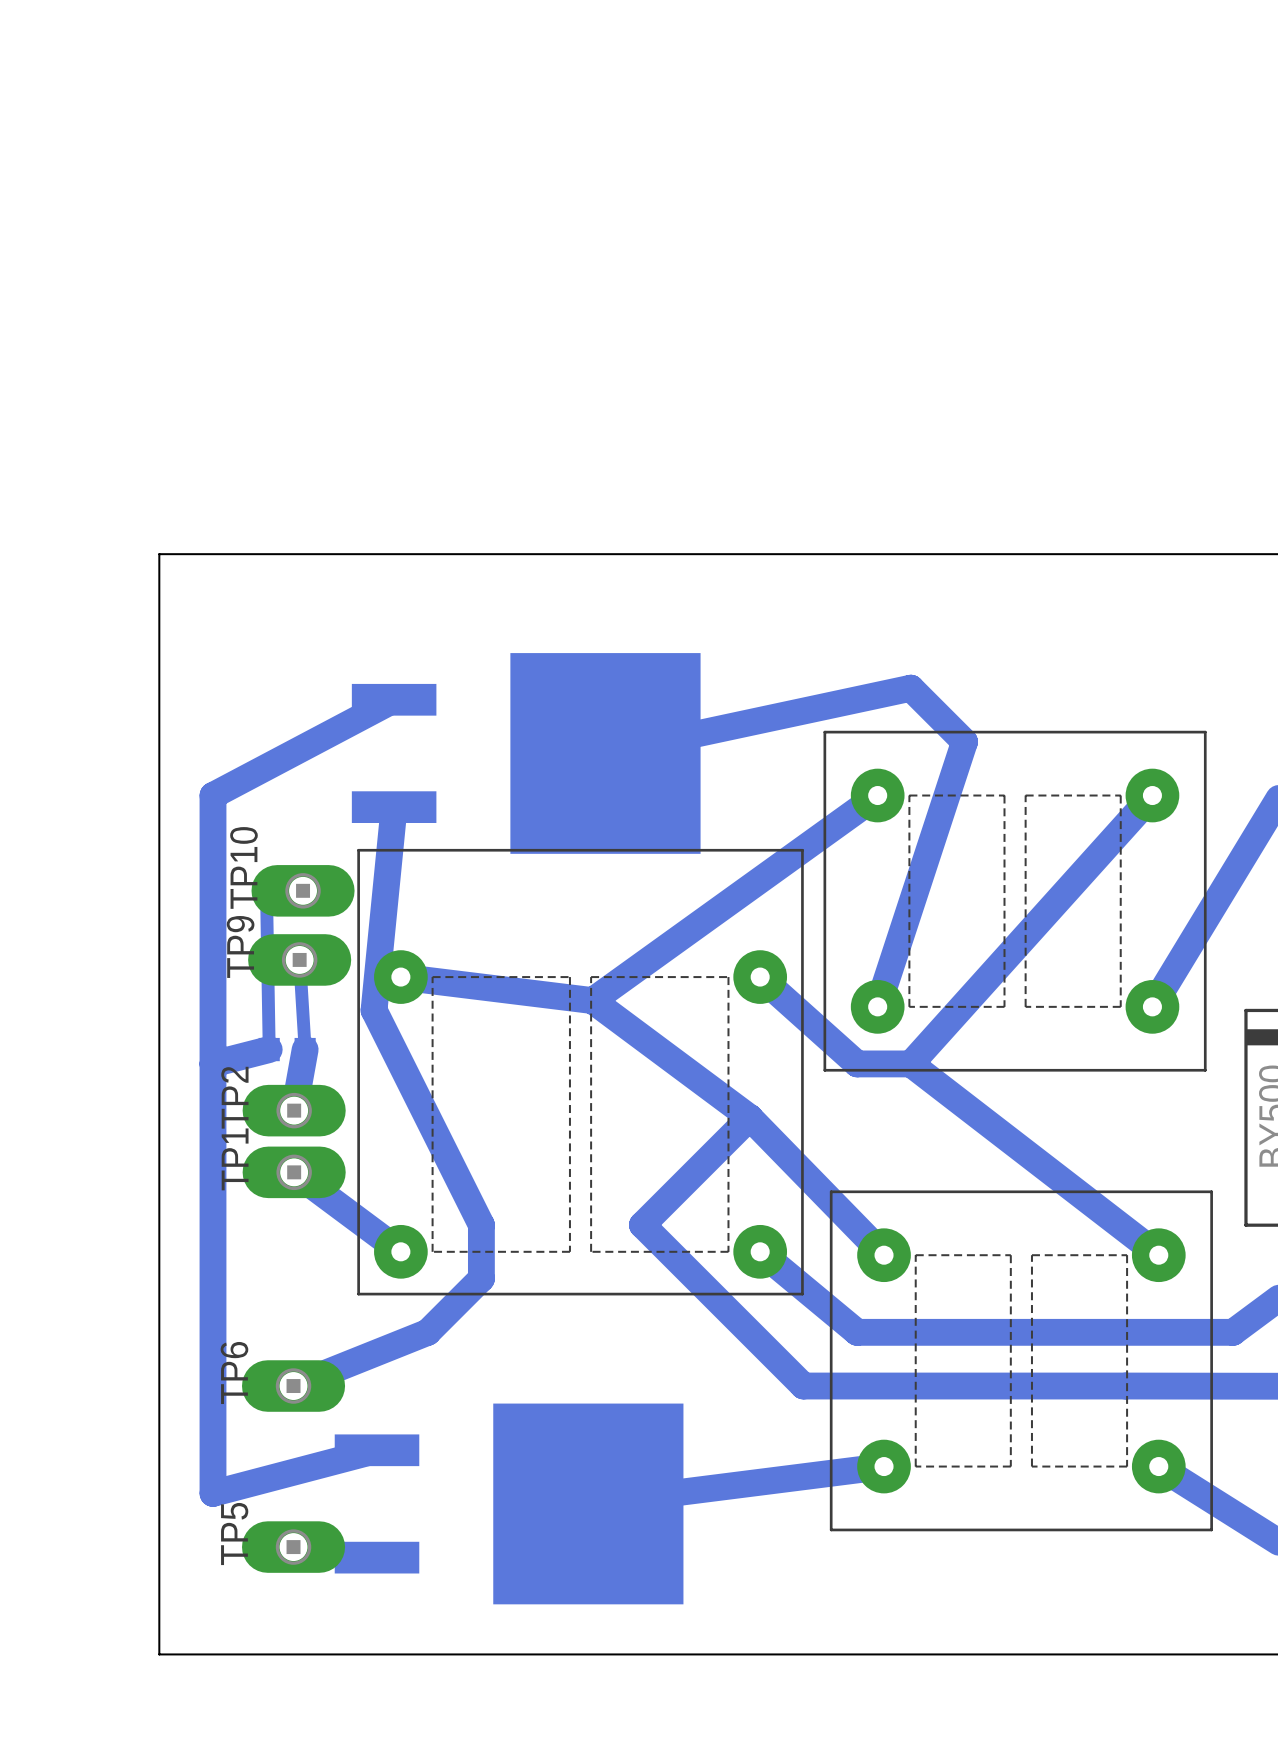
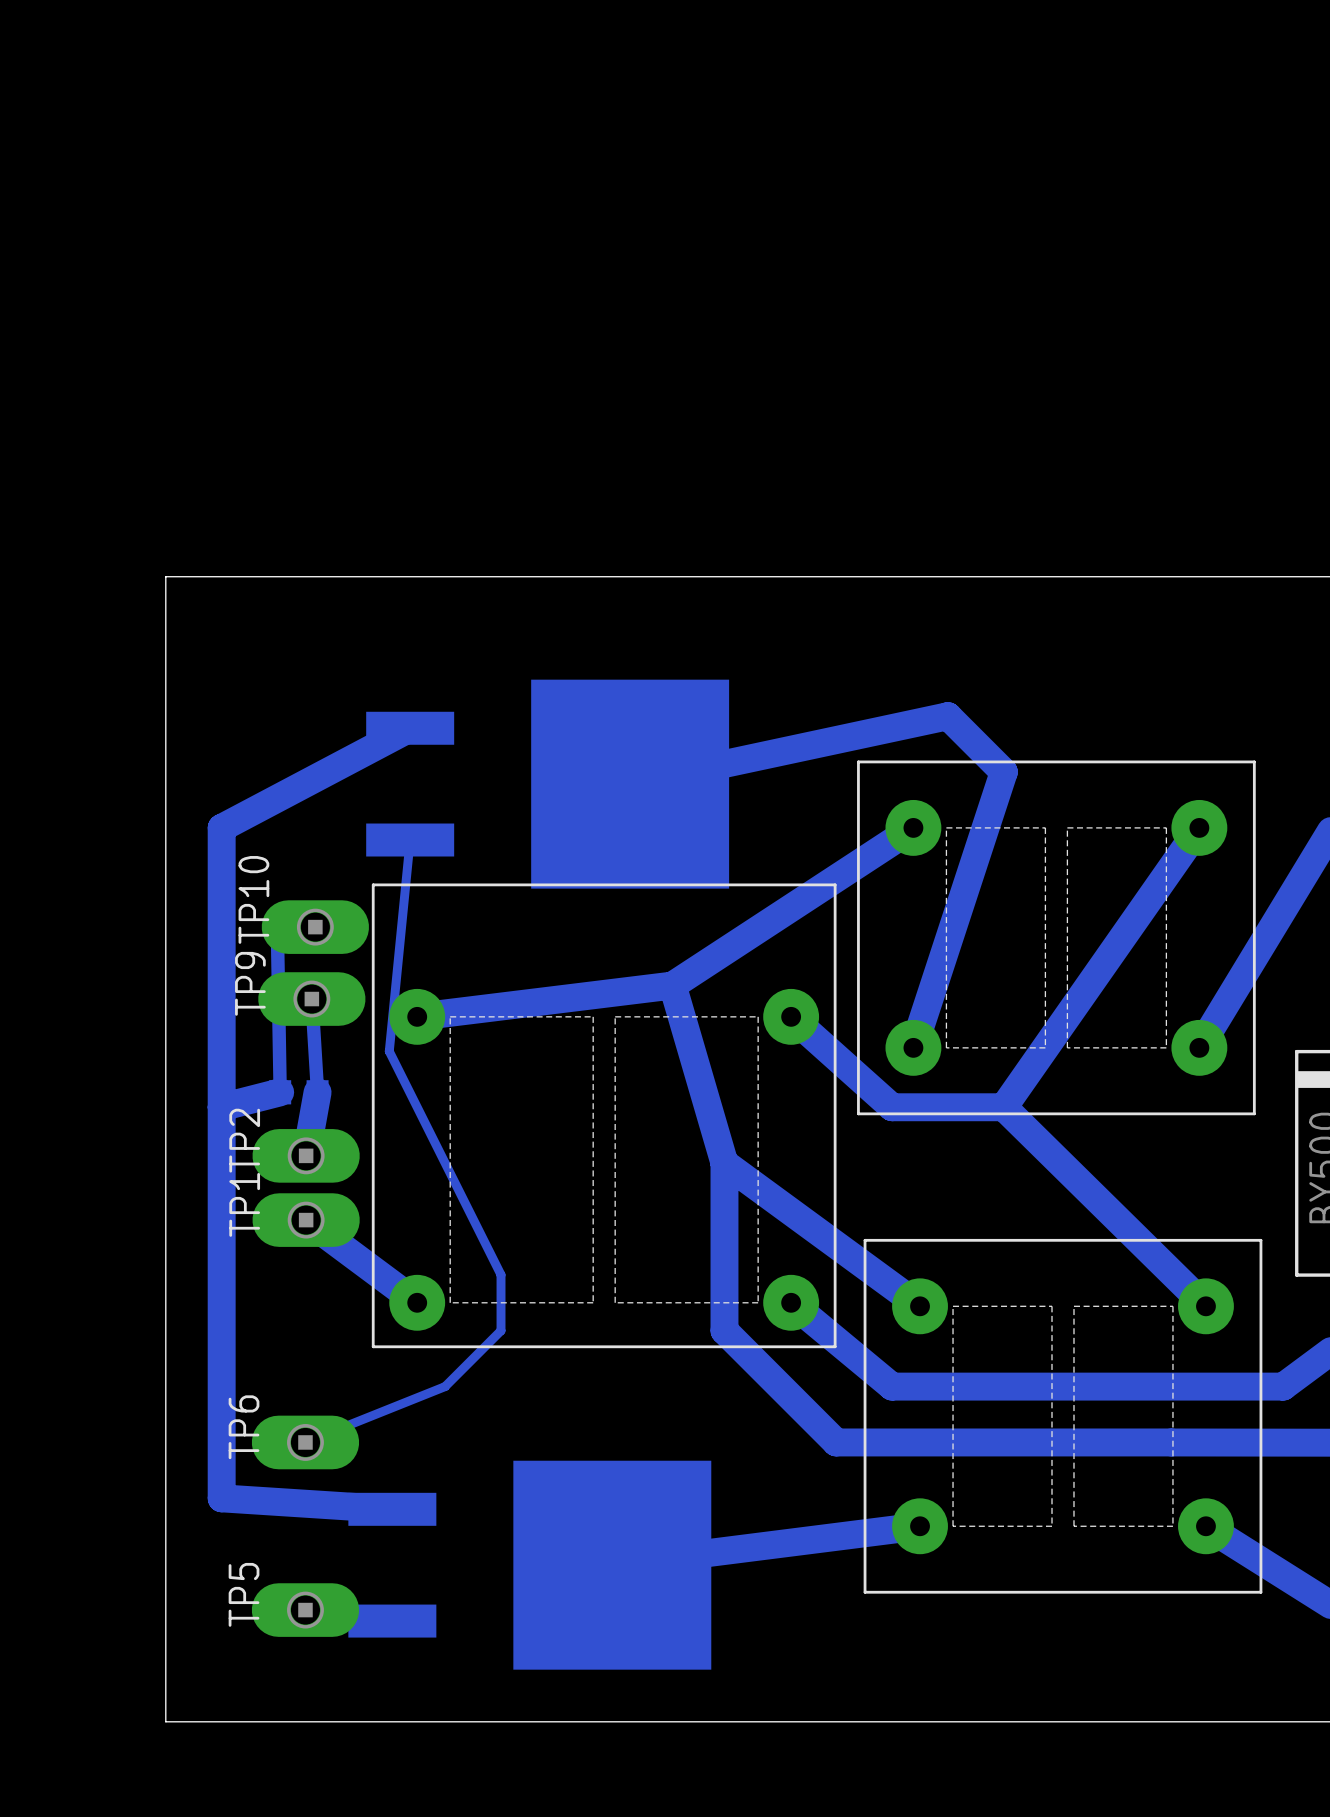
bottom track: (877, 795) (592, 1000) -> (913, 827) (672, 985)
bottom track: (1152, 795) (910, 1063) (1158, 1255) -> (1199, 827) (1003, 1107)
bottom track width: thick (394, 807) (374, 1010) (481, 1224) (481, 1278) (427, 1332) (293, 1386) -> thin (410, 840) (389, 1051) (501, 1274) (501, 1330) (445, 1386) (305, 1442)
bottom track: none -> (672, 985) (724, 1163)
bottom track: (400, 977) (592, 1000) -> (417, 1016) (672, 985)
bottom track: (592, 1000) (749, 1117) -> none
bottom track: none -> (947, 1107) (1003, 1107)
bottom track: none -> (1003, 1107) (1205, 1306)
bottom track: (749, 1117) (884, 1255) -> (724, 1163) (920, 1306)
bottom track: (749, 1117) (642, 1224) (696, 1278) -> (724, 1163) (724, 1330)
bottom track: (213, 1439) (213, 1493) (377, 1450) -> (221, 1498) (392, 1509)

